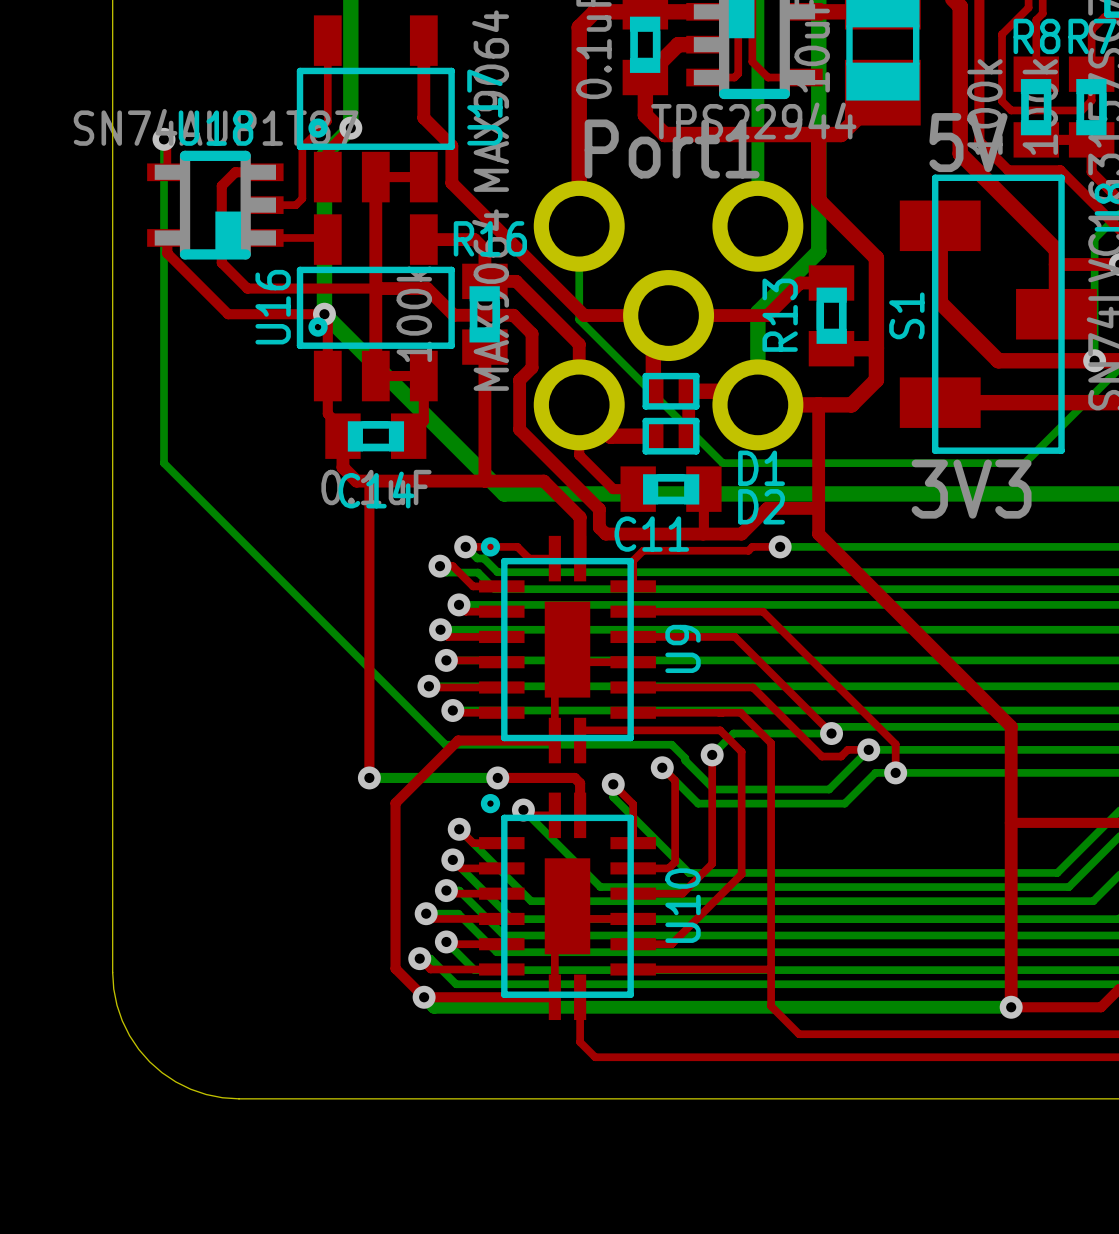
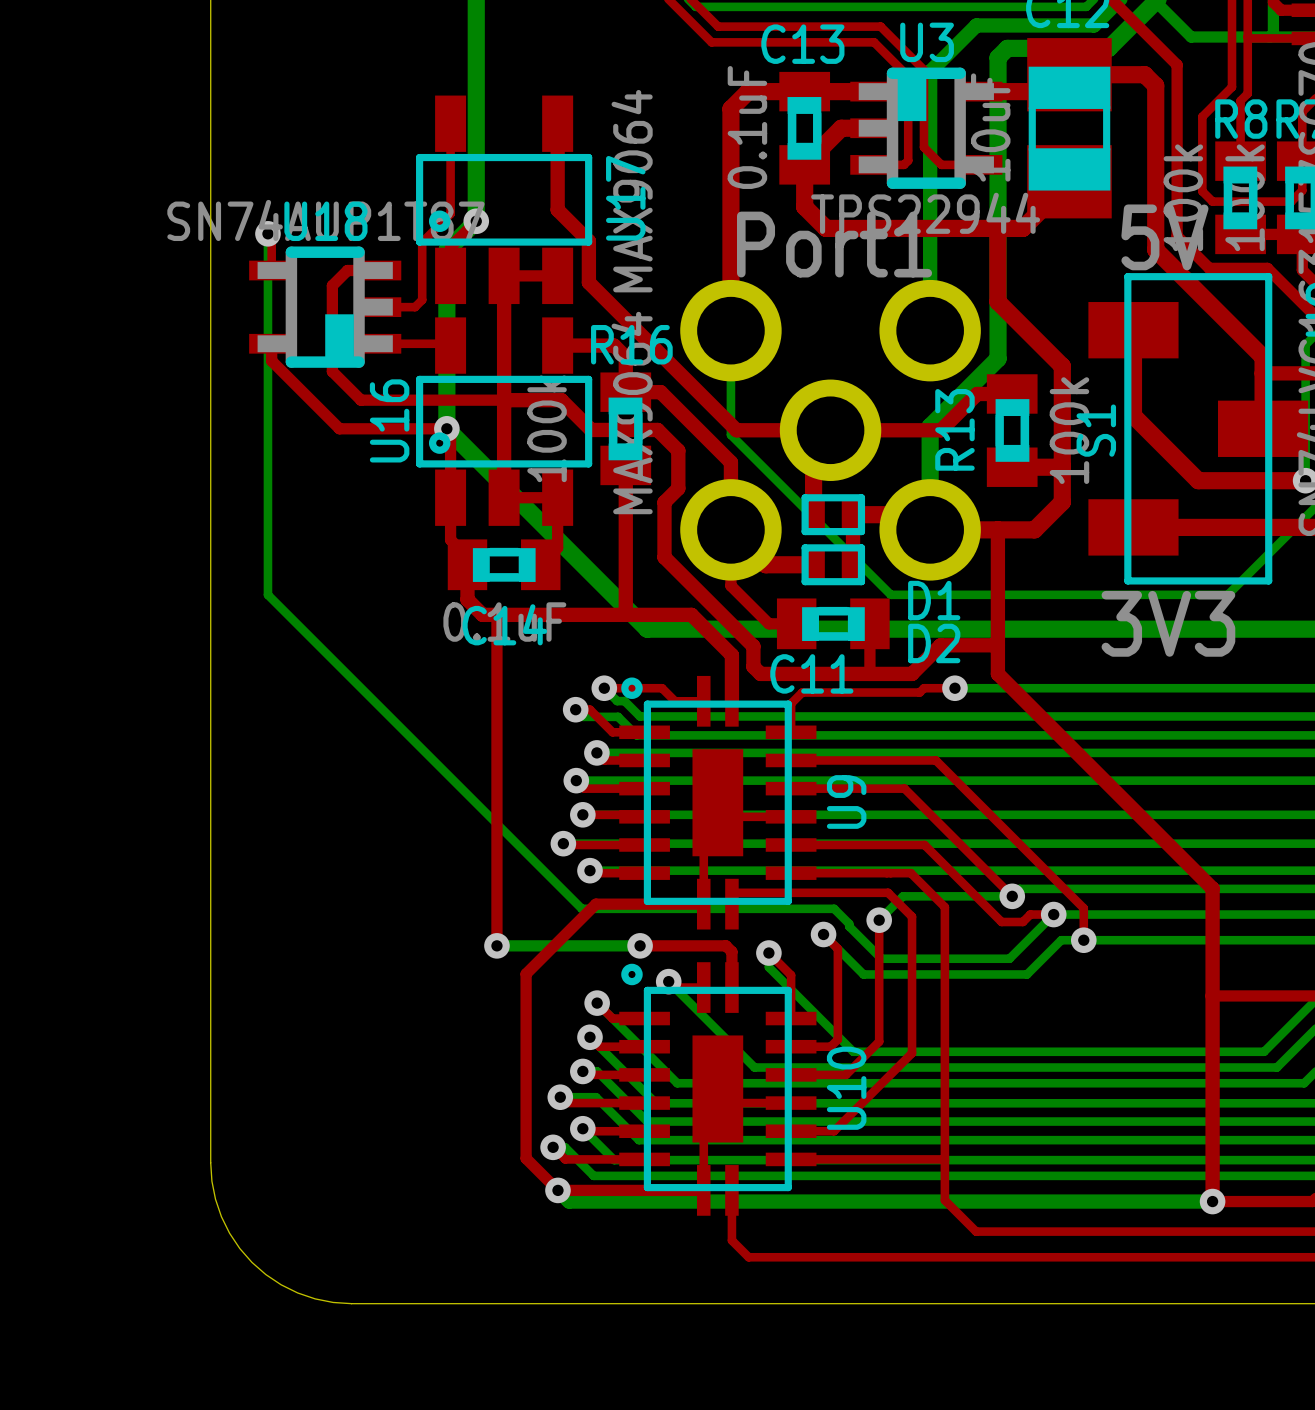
R13 value: none -> 100k (1069, 430)

